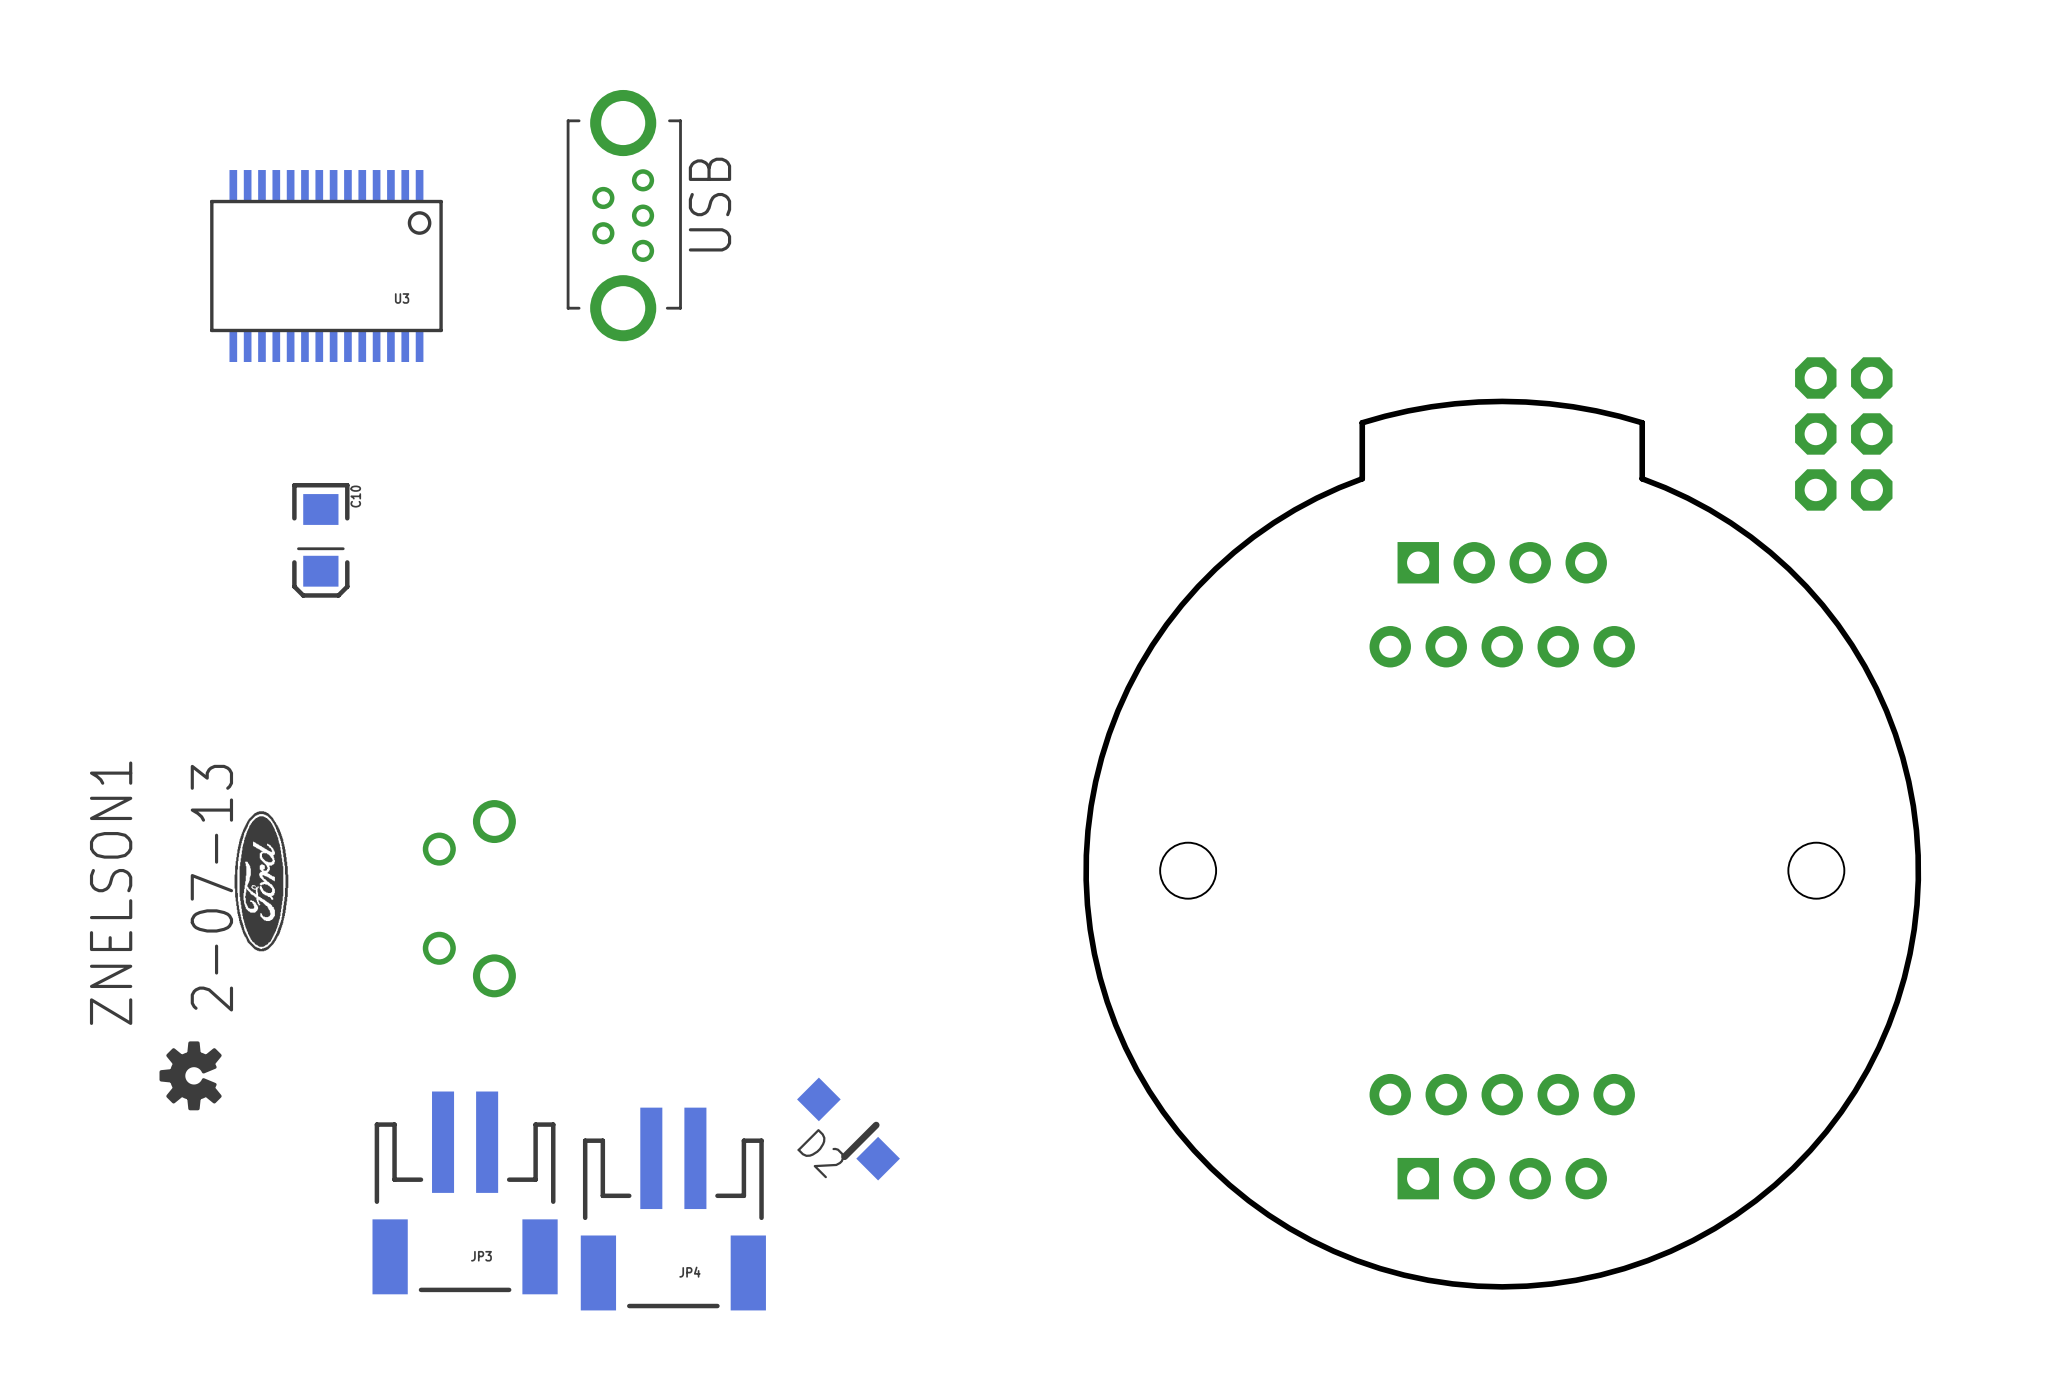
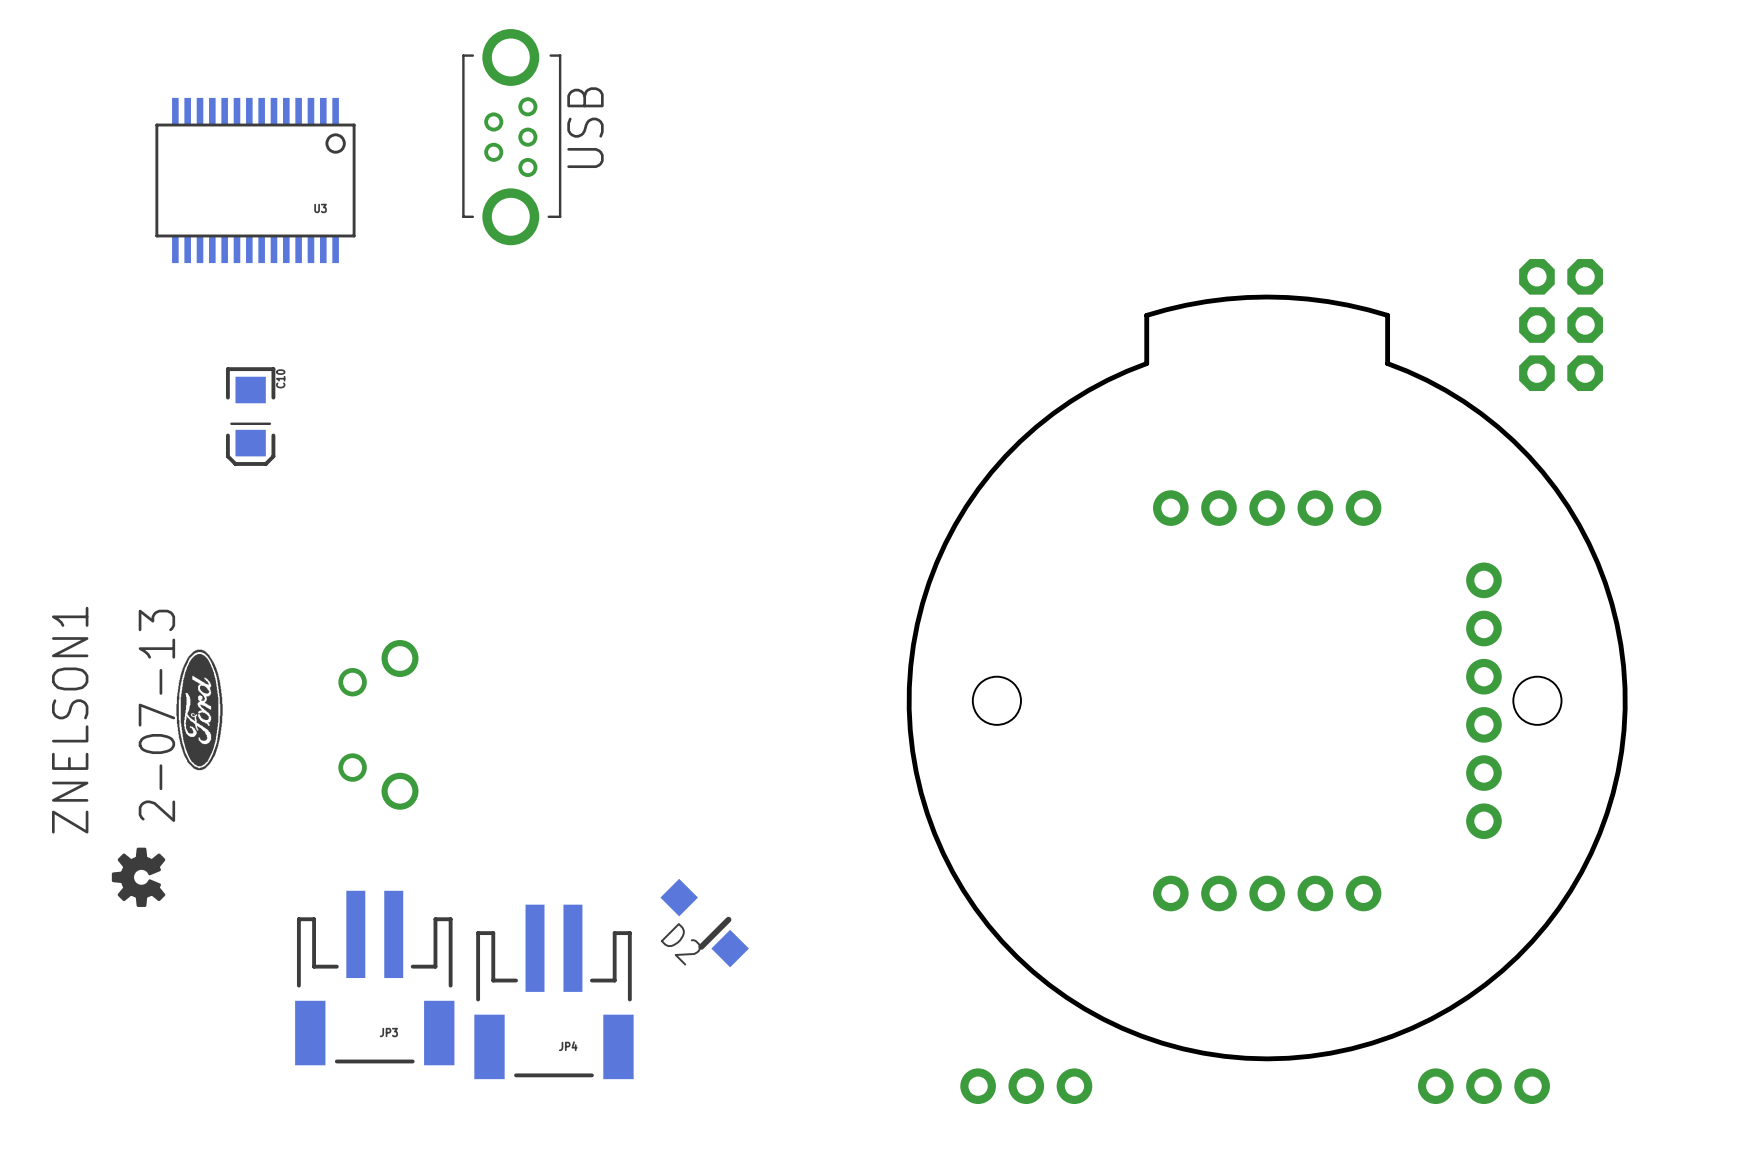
part: (1502, 562) -> none
part: none -> (1483, 700)
part: (1502, 1178) -> none
part: none -> (1026, 1086)
part: none -> (1483, 1086)

